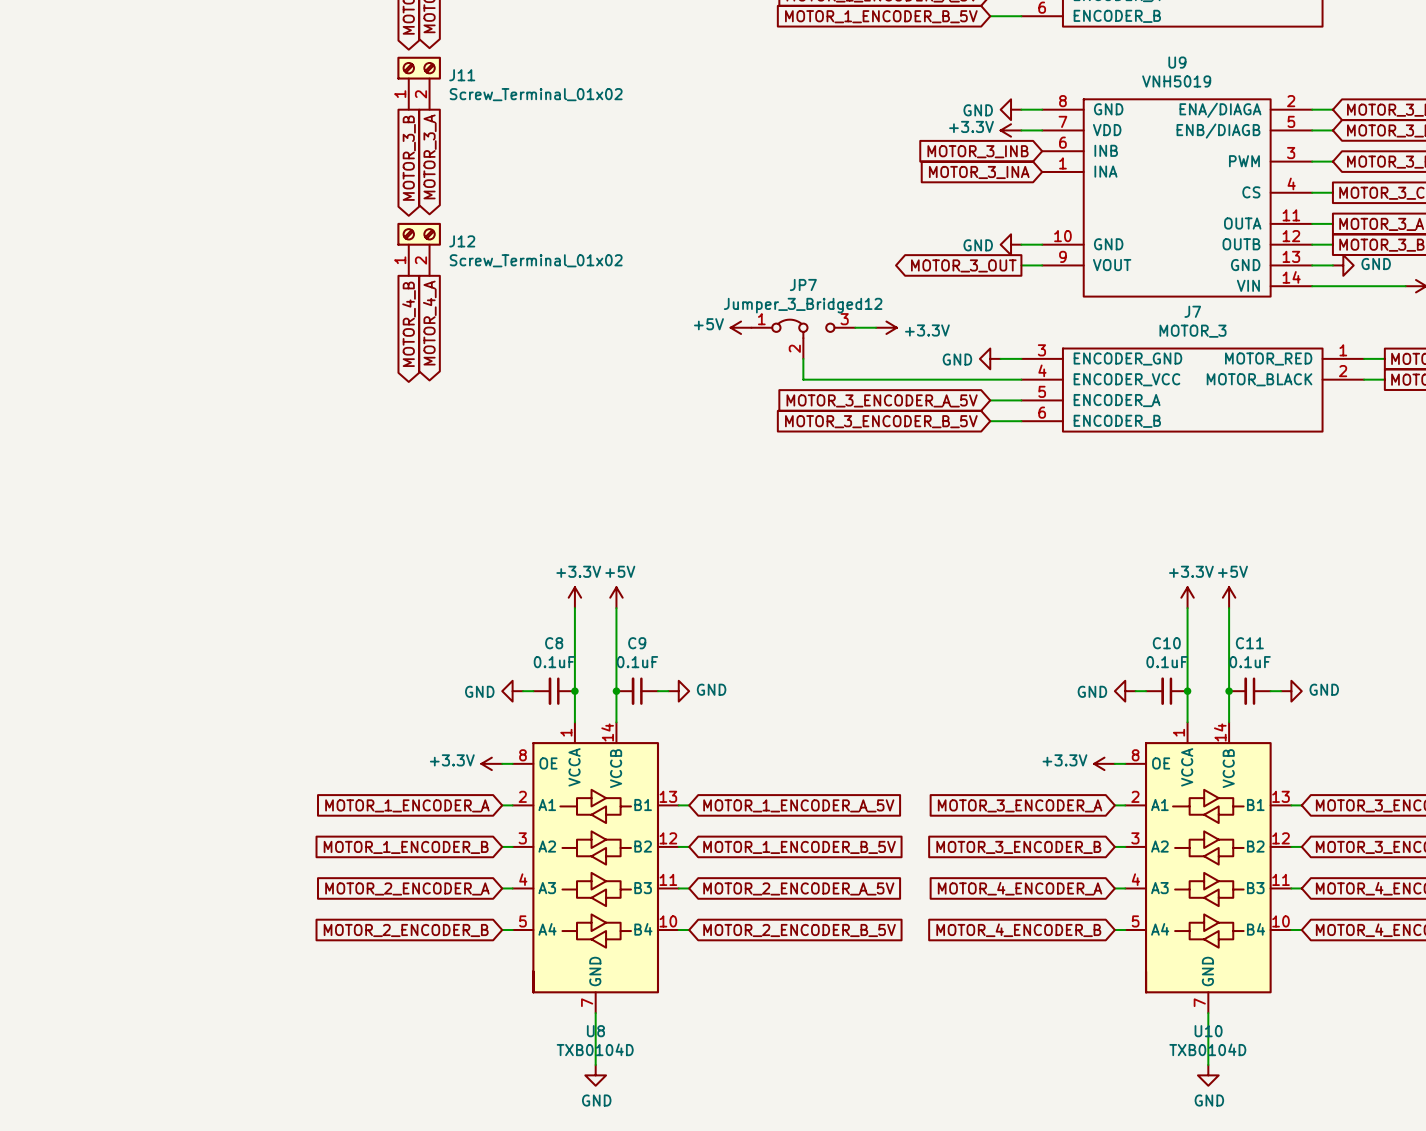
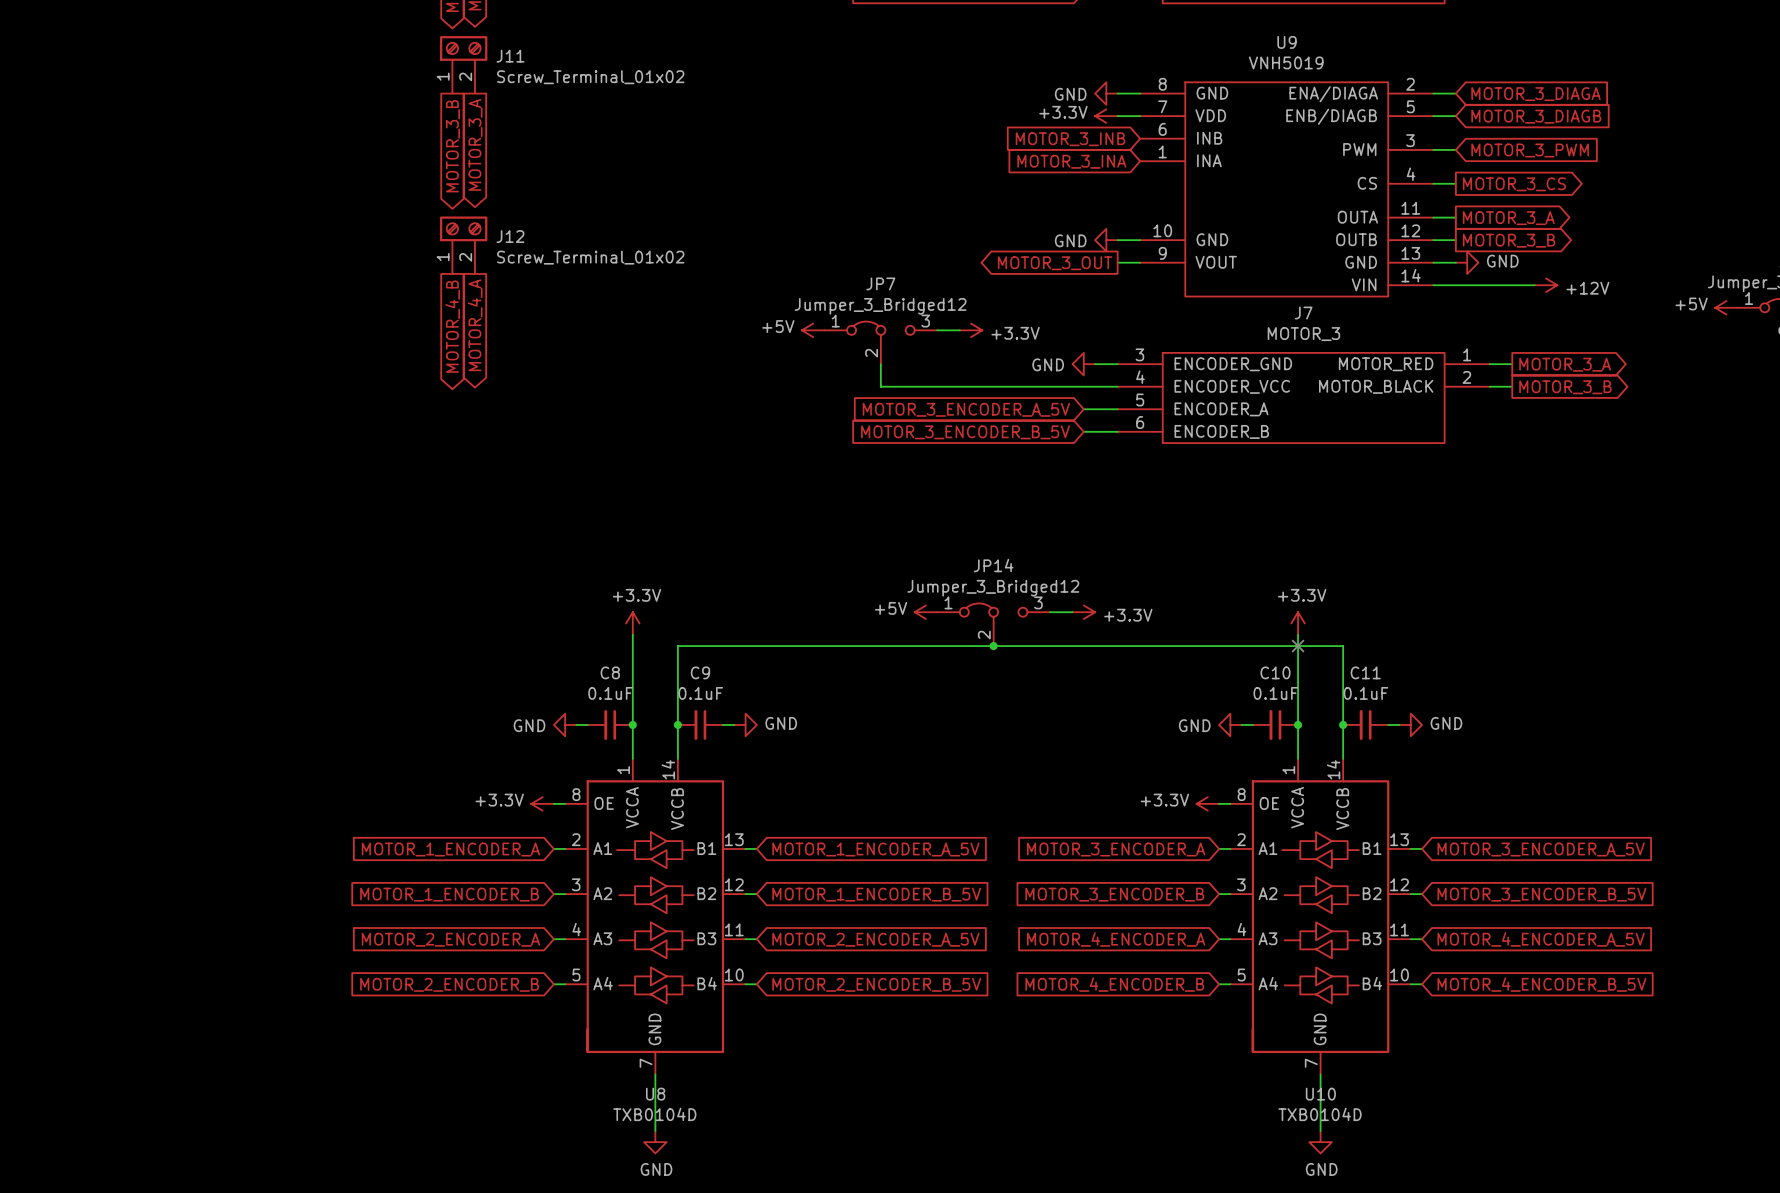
power symbol: none -> +5V (925, 612)
wire: none -> (1049, 612) (1072, 612)
power symbol: none -> +3.3V (1083, 612)
power symbol: +5V (616, 597) -> none
power symbol: +5V (1229, 597) -> none
JP14: none -> Jumper_3_Bridged12 (993, 624)
wire: (616, 608) (616, 618) -> (1343, 646) (677, 646)
wire: (1229, 608) (1229, 618) -> none
junction: none -> (993, 646)
no-connect mark: none -> (1298, 646)

